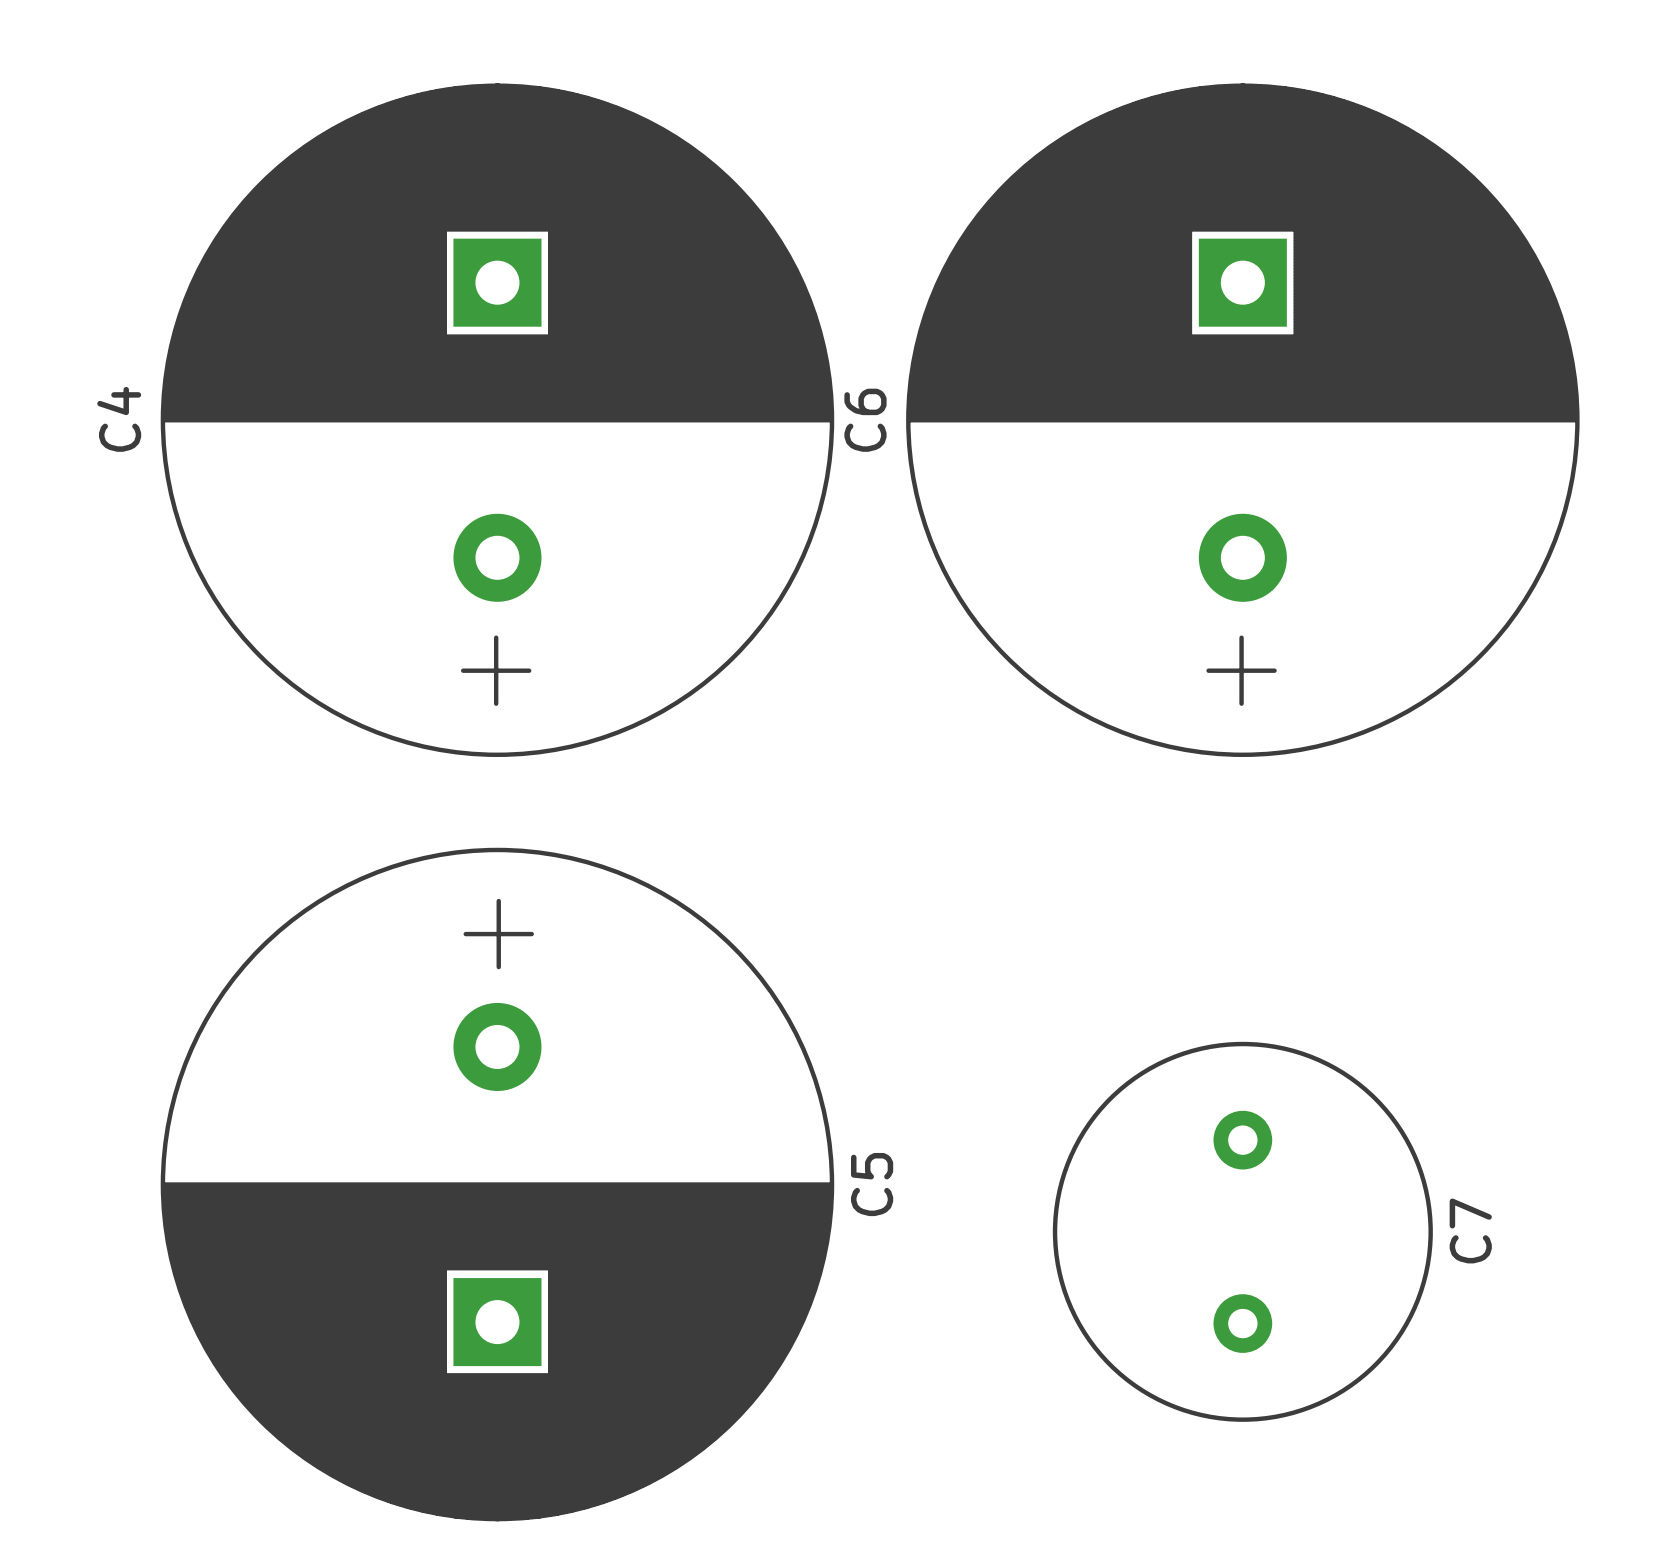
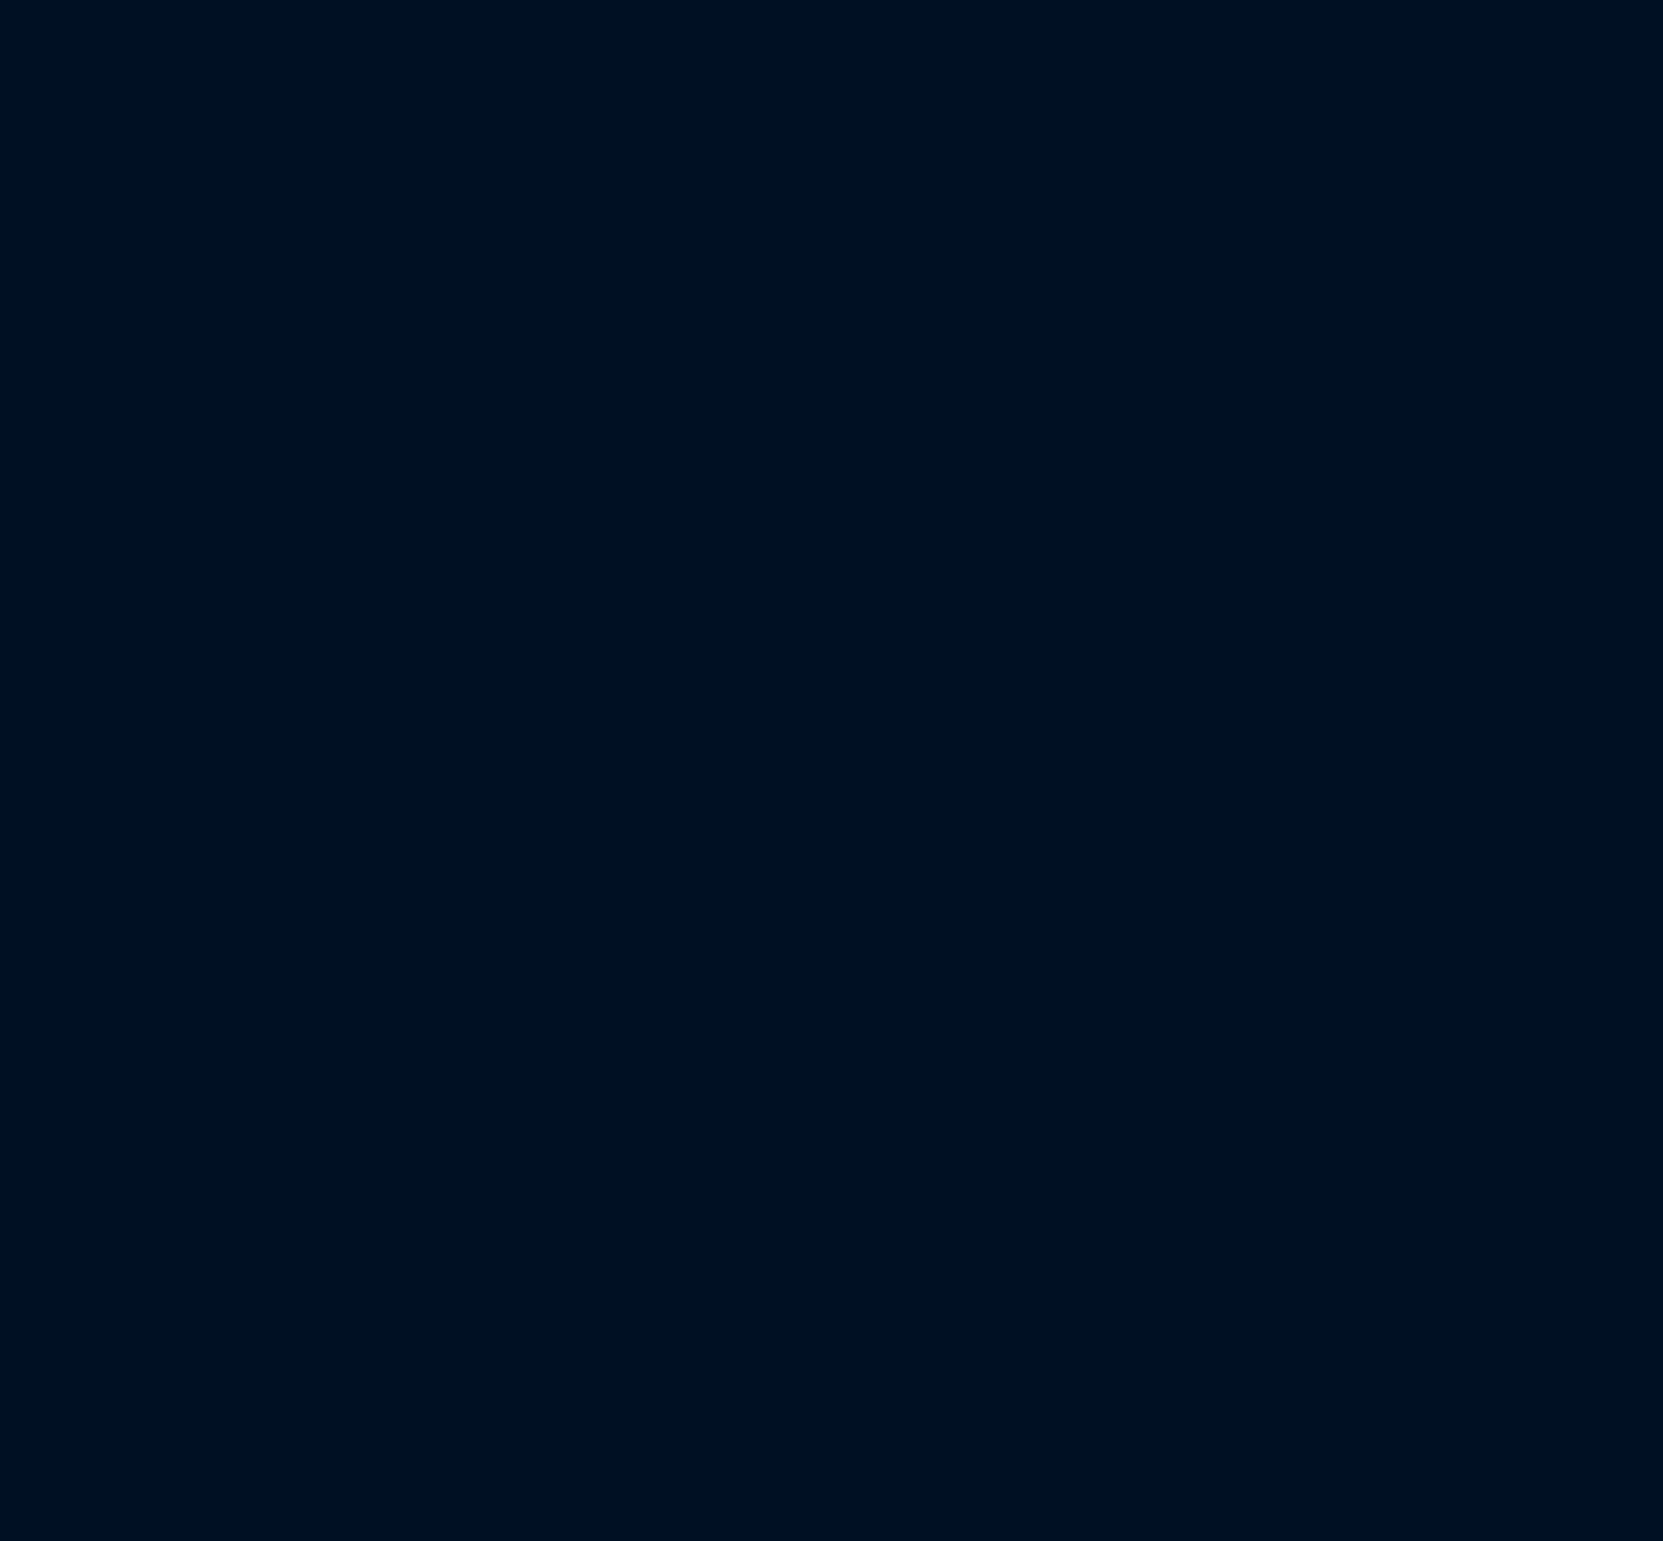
C4: (497, 420) -> none
C6: (1242, 420) -> none
C5: (497, 1184) -> none
C7: (1242, 1231) -> none

